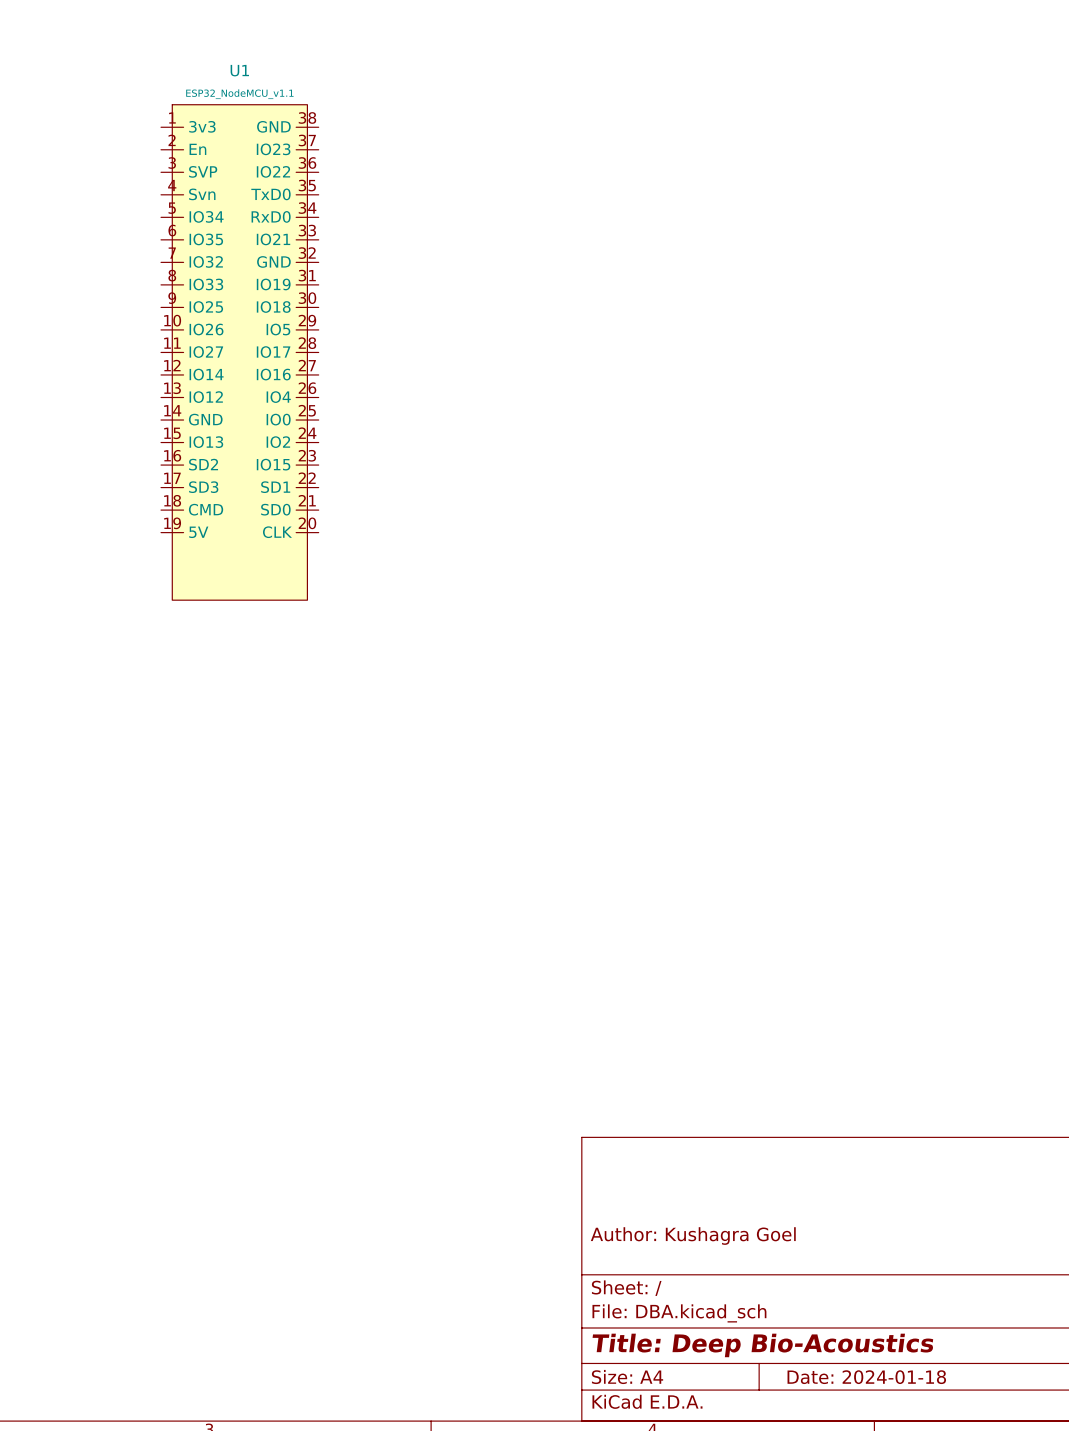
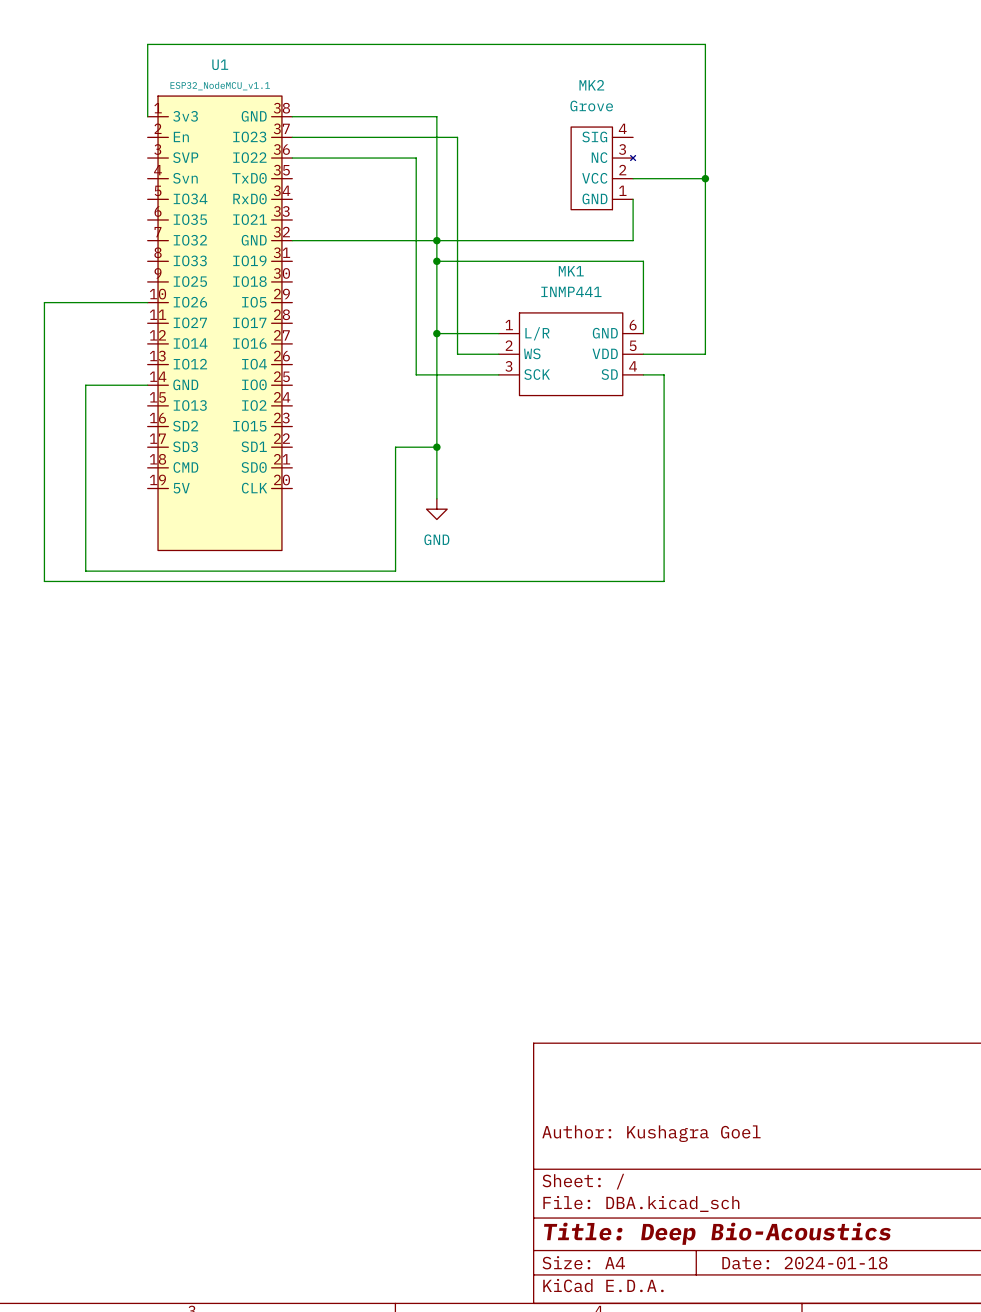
wire: none -> (147, 116) (147, 44) (705, 44) (705, 354) (643, 354)
wire: none -> (292, 116) (436, 116) (436, 498)
wire: none -> (292, 137) (457, 137) (457, 354) (498, 354)
wire: none -> (292, 158) (416, 158) (416, 374) (498, 374)
MK2: none -> Grove (603, 168)
wire: none -> (633, 178) (705, 178)
junction: none -> (705, 178)
wire: none -> (633, 199) (633, 240) (292, 240)
junction: none -> (436, 240)
wire: none -> (436, 261) (643, 261) (643, 333)
junction: none -> (436, 261)
wire: none -> (147, 302) (44, 302) (44, 581) (664, 581) (664, 374) (643, 374)
wire: none -> (436, 333) (498, 333)
junction: none -> (436, 333)
MK1: none -> INMP441 (571, 354)
wire: none -> (147, 385) (85, 385) (85, 571) (395, 571) (395, 447) (436, 447)
junction: none -> (436, 447)
power symbol: none -> GND (436, 509)

